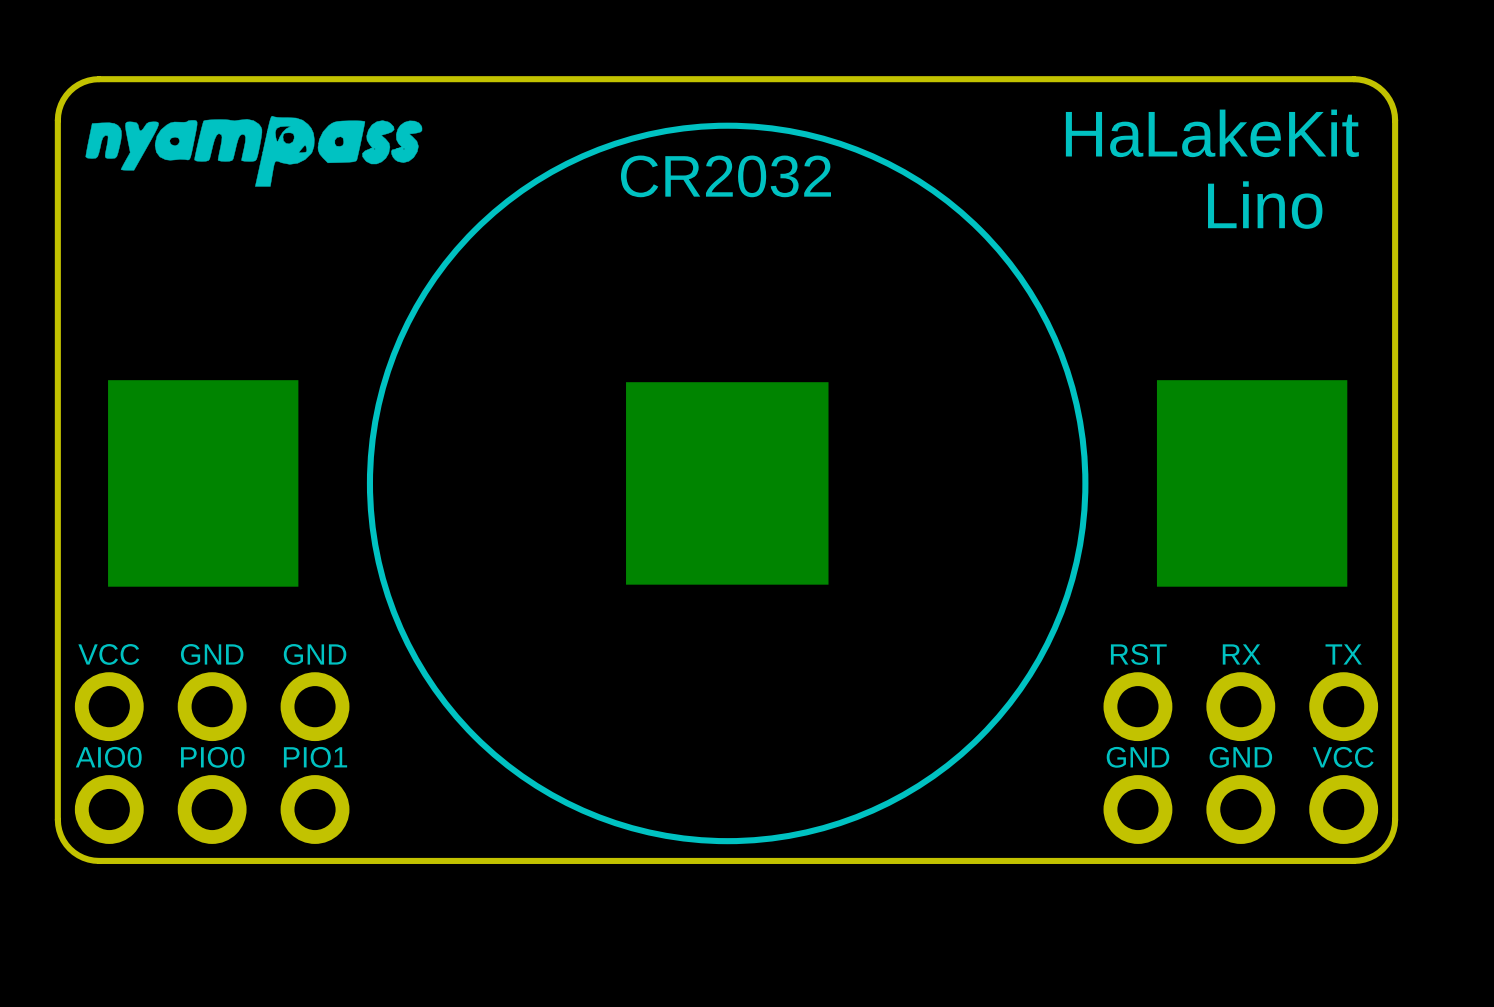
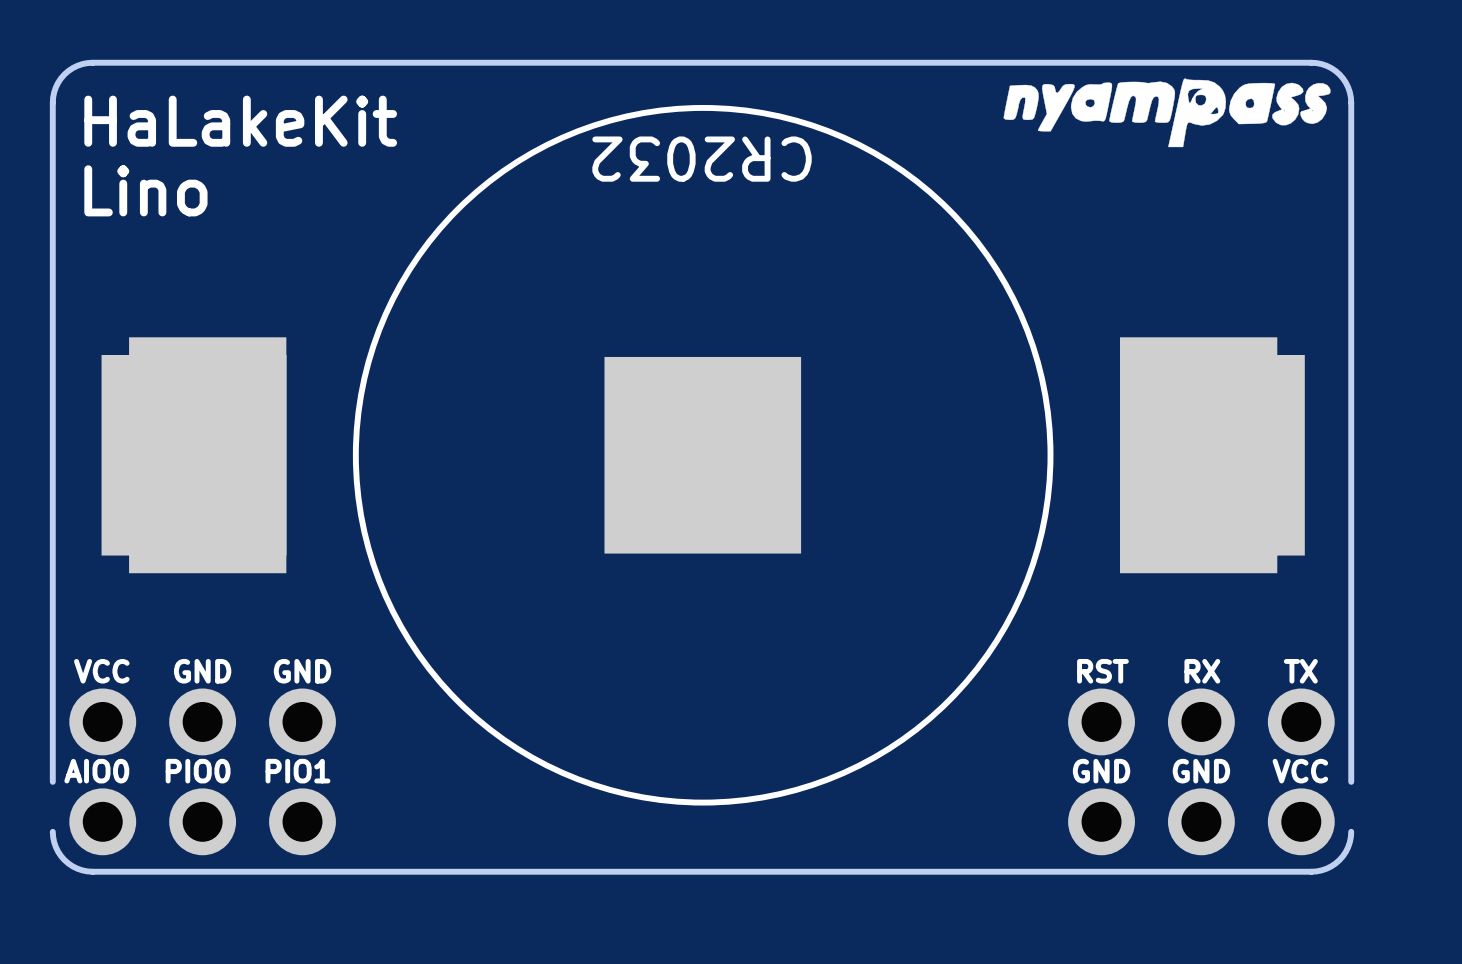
part footprint: [108, 122, 1348, 845] -> [101, 104, 1305, 806]
text: HaLakeKit (1212, 133) -> none
text: none -> HaLakeKit (240, 121)
drawing position: (253, 151) -> (1167, 112)
text: none -> CR2032 (702, 159)
text: Lino (1265, 205) -> none
text: none -> Lino (145, 190)
text position: VCC (108, 654) -> VCC (101, 671)
text position: GND (212, 654) -> GND (202, 671)
text position: GND (315, 654) -> GND (302, 671)
text position: RST (1138, 654) -> RST (1102, 671)
text position: RX (1241, 654) -> RX (1202, 671)
text position: TX (1343, 654) -> TX (1300, 671)
part: (212, 706) -> none
part: (1240, 706) -> none
text position: AIO0 (108, 757) -> AIO0 (96, 771)
text position: PIO0 (212, 757) -> PIO0 (198, 771)
text position: PIO1 (315, 757) -> PIO1 (297, 771)
text position: GND (1137, 757) -> GND (1101, 771)
text position: GND (1240, 757) -> GND (1201, 771)
text position: VCC (1343, 757) -> VCC (1300, 771)
part: none -> (202, 721)
part: none -> (1201, 721)
part: (212, 809) -> none
part: (1240, 809) -> none
board edge: (1395, 819) (1391, 835) (1383, 848) (1369, 857) (1353, 860) (99, 860) (83, 857) (69, 848) (60, 835) (57, 819) -> (1351, 831) (1348, 847) (1339, 860) (1326, 868) (1311, 871) (92, 871) (77, 868) (64, 860) (55, 847) (52, 831)
part: none -> (202, 821)
part: none -> (1201, 821)

